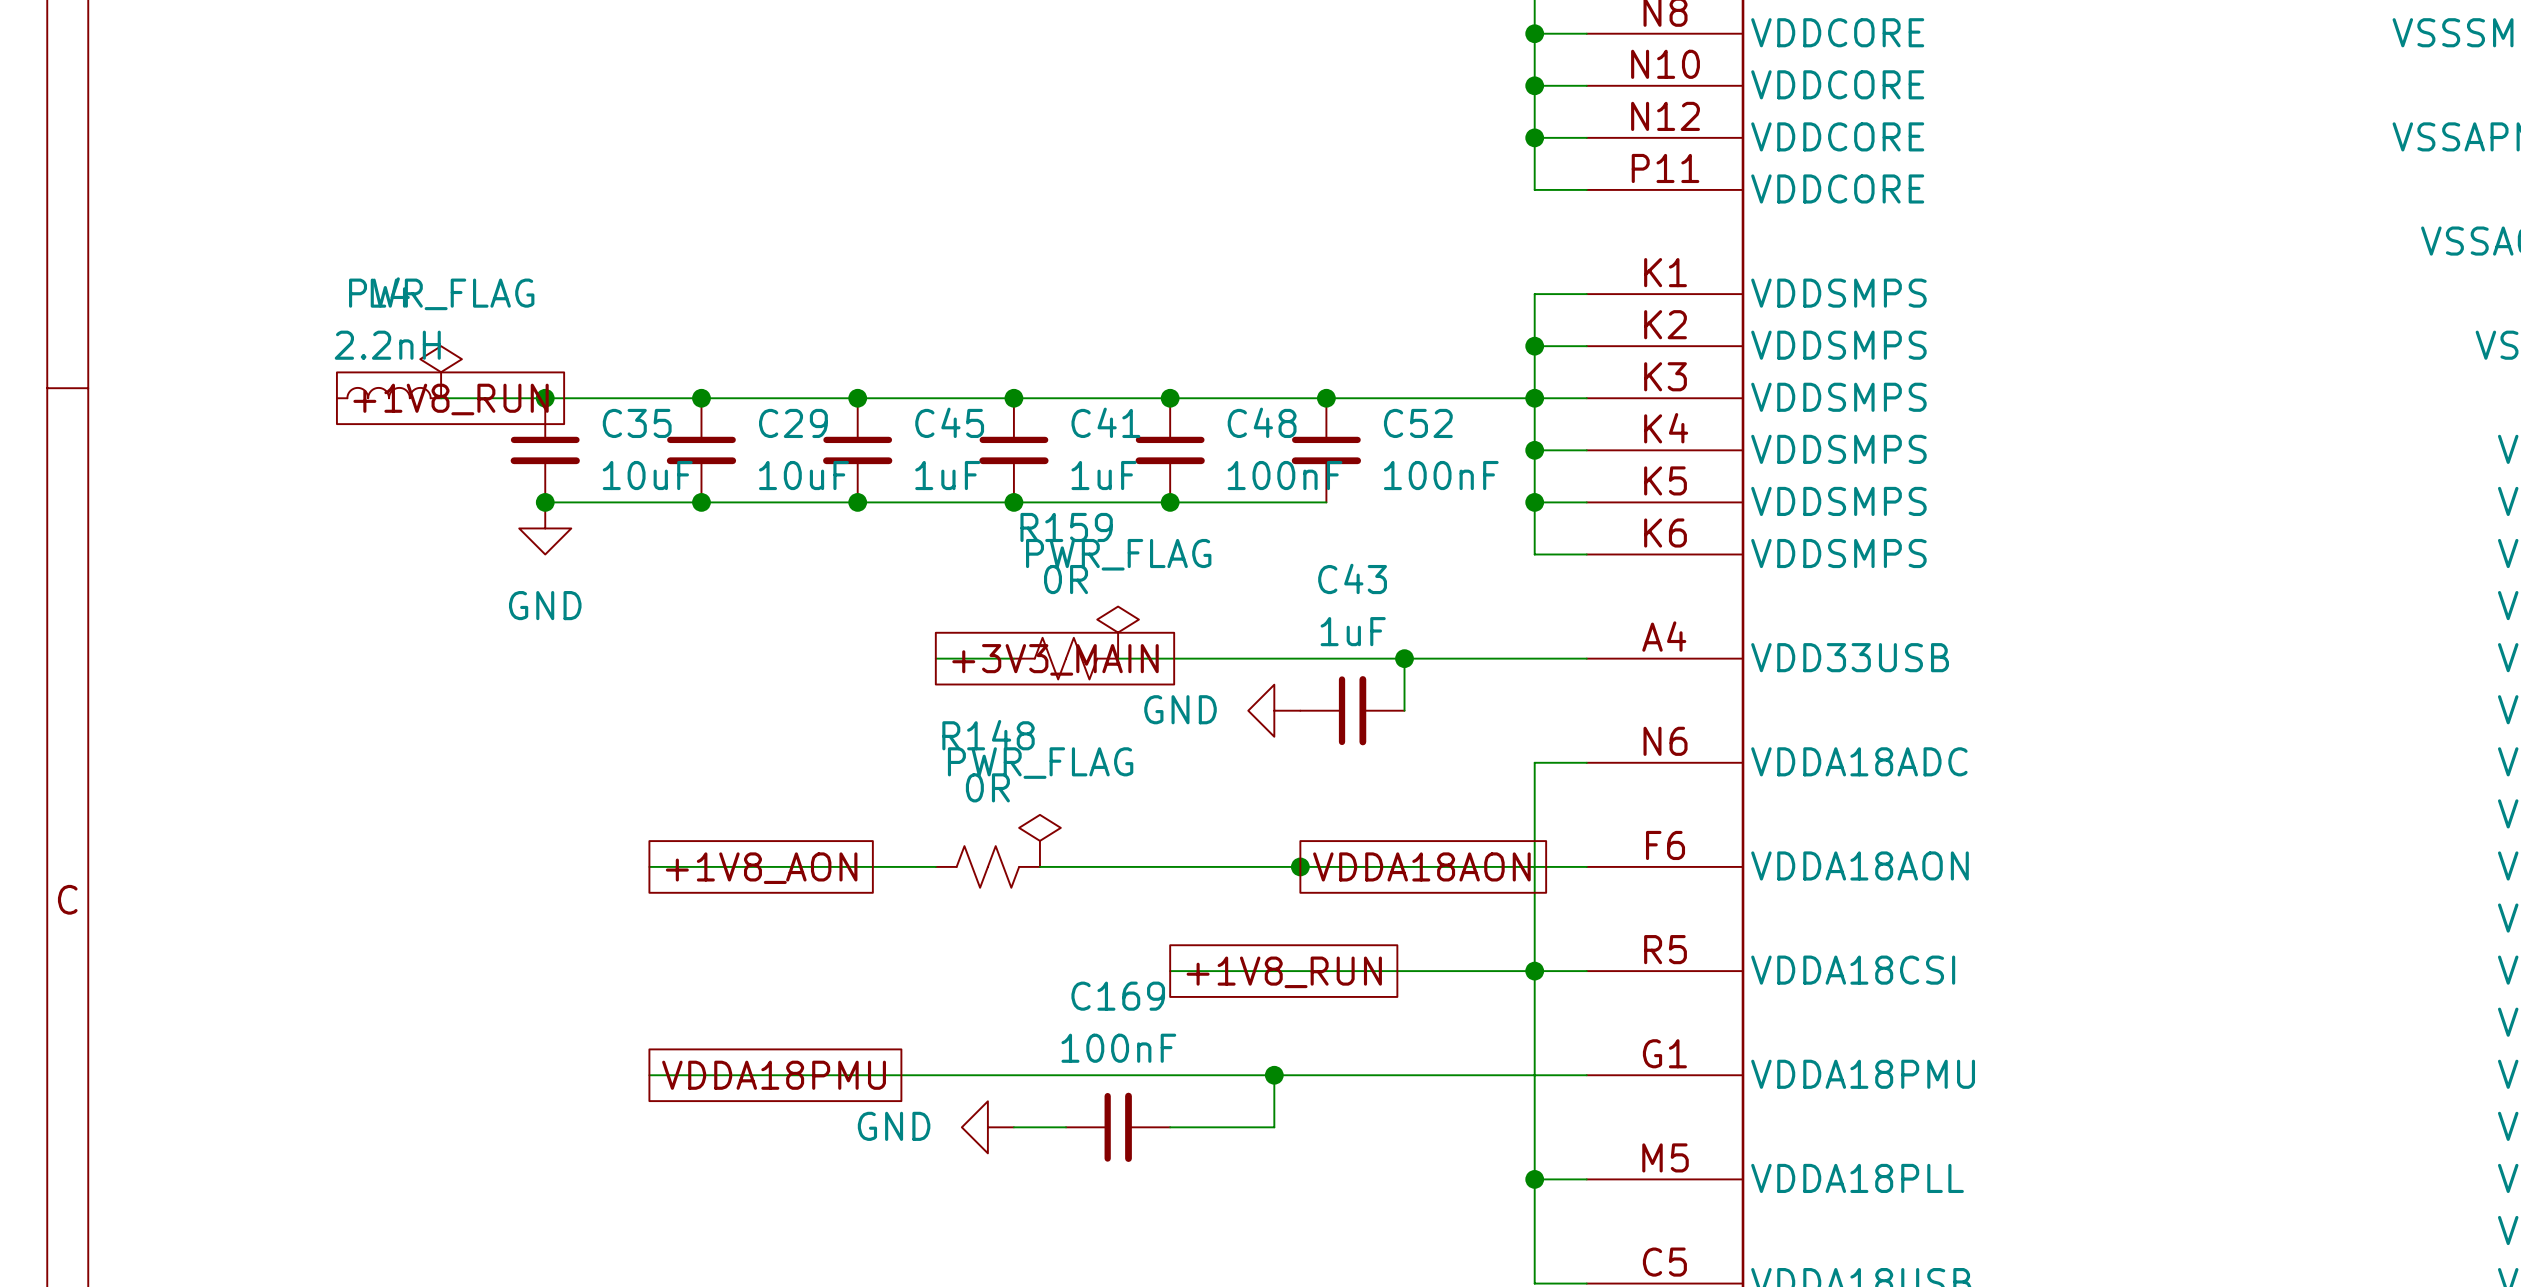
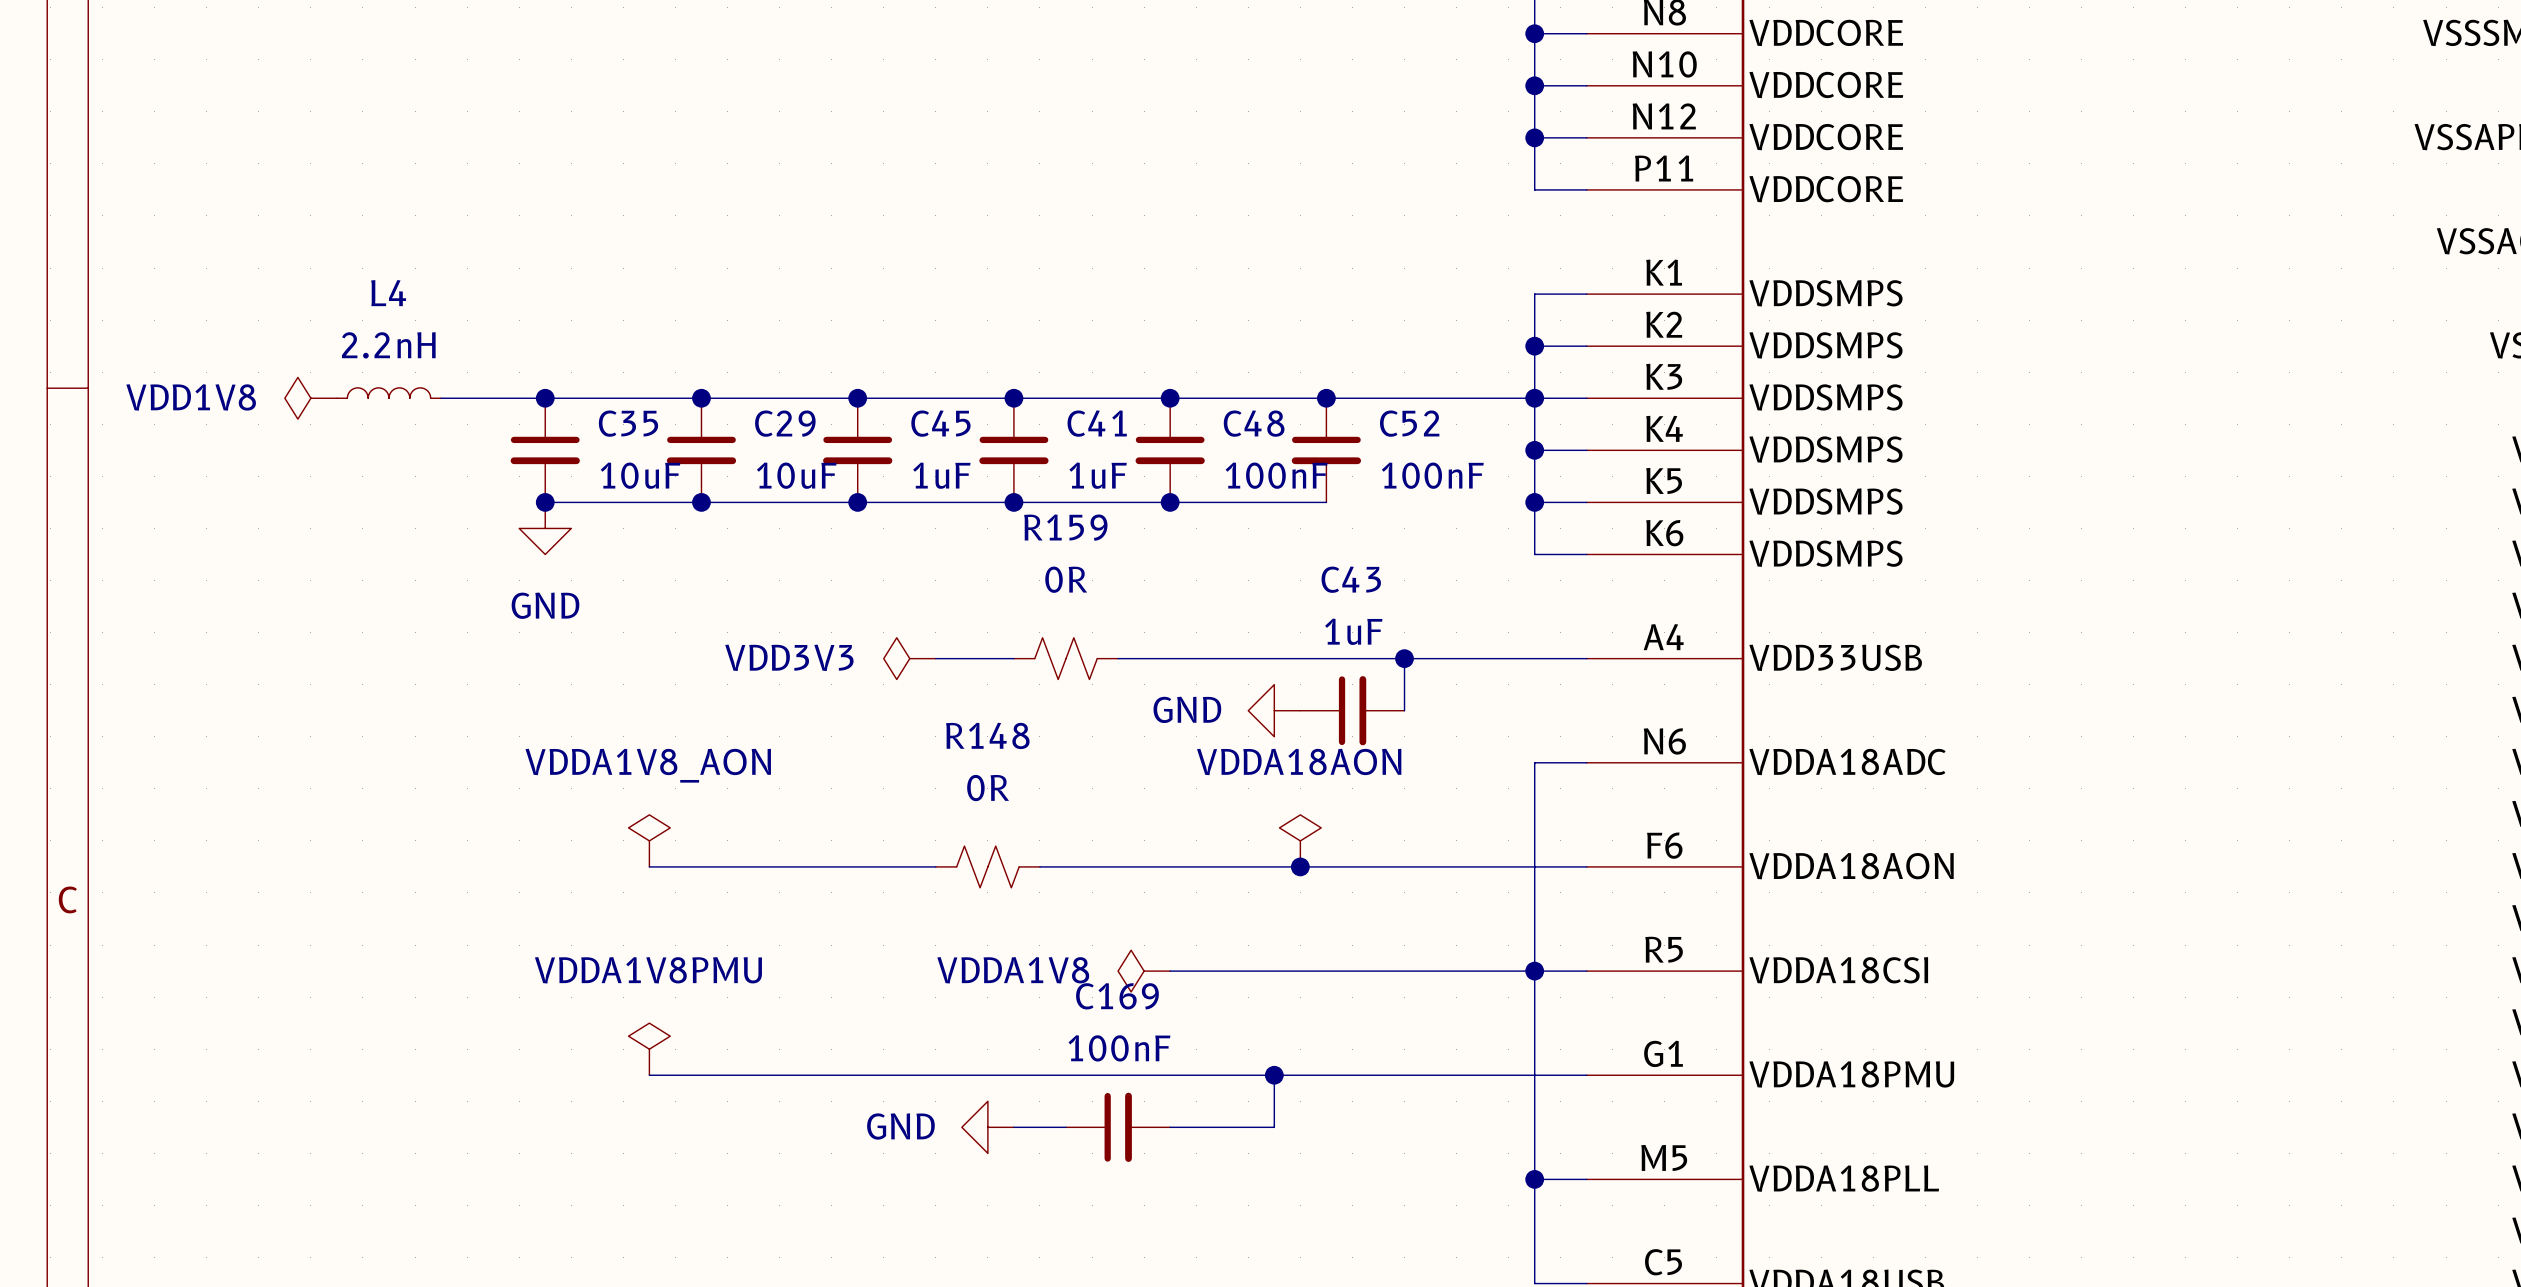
power symbol: PWR_FLAG (441, 372) -> none
power symbol: none -> VDD1V8 (310, 398)
global label: +1V8_RUN (451, 399) -> none
power symbol: PWR_FLAG (1118, 632) -> none
power symbol: none -> VDD3V3 (909, 658)
global label: +3V3_MAIN (1055, 659) -> none
power symbol: none -> VDDA1V8_AON (649, 840)
power symbol: PWR_FLAG (1039, 840) -> none
power symbol: none -> VDDA18AON (1300, 840)
global label: VDDA18AON (1421, 866) -> none
global label: +1V8_AON (761, 868) -> none
power symbol: none -> VDDA1V8 (1144, 971)
global label: +1V8_RUN (1284, 972) -> none
power symbol: none -> VDDA1V8PMU (649, 1049)
global label: VDDA18PMU (774, 1075) -> none

